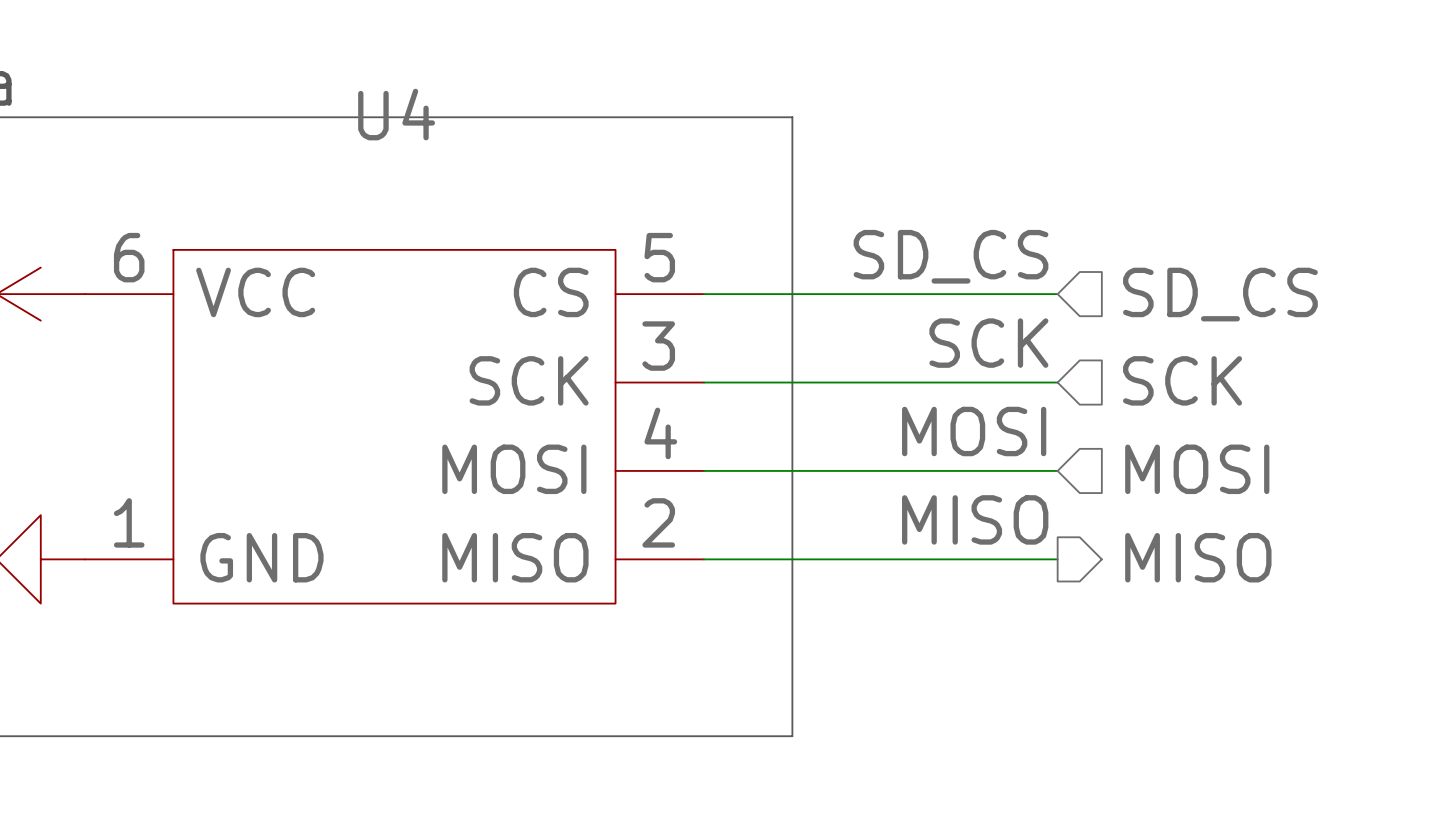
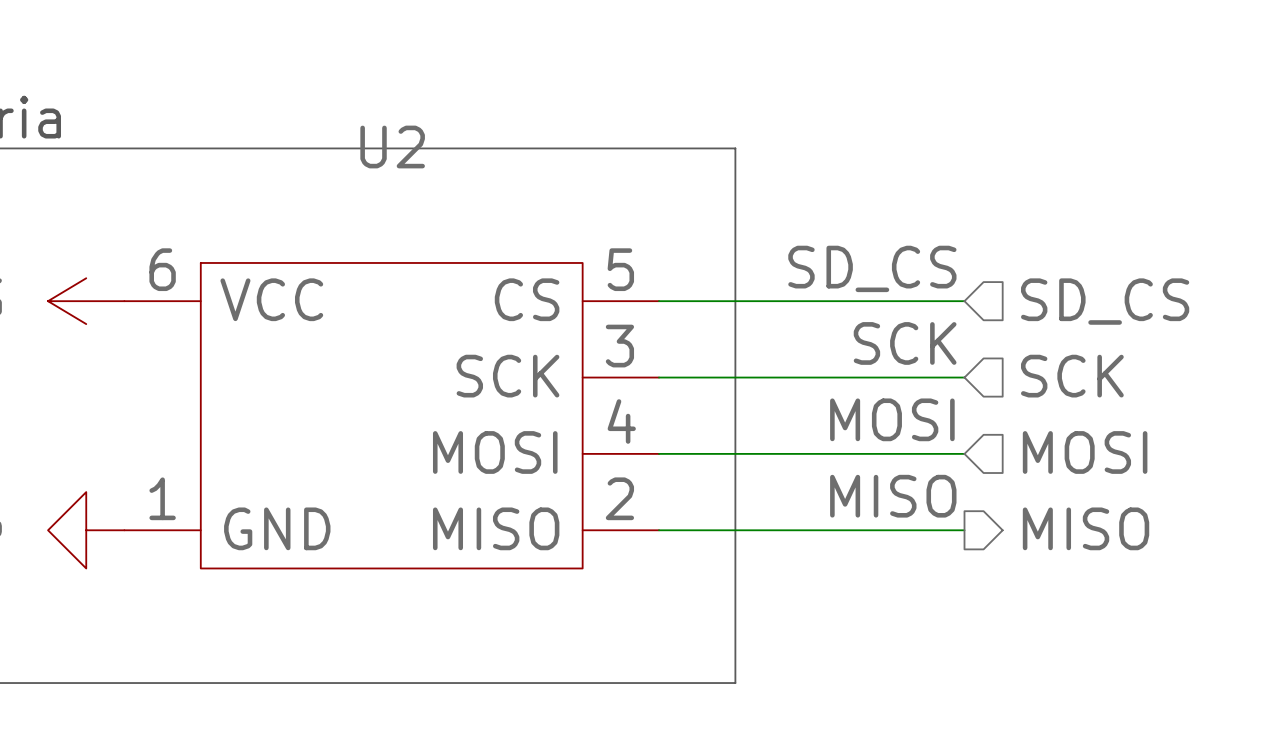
U4 name: U4 (396, 114) -> U2 (392, 147)

